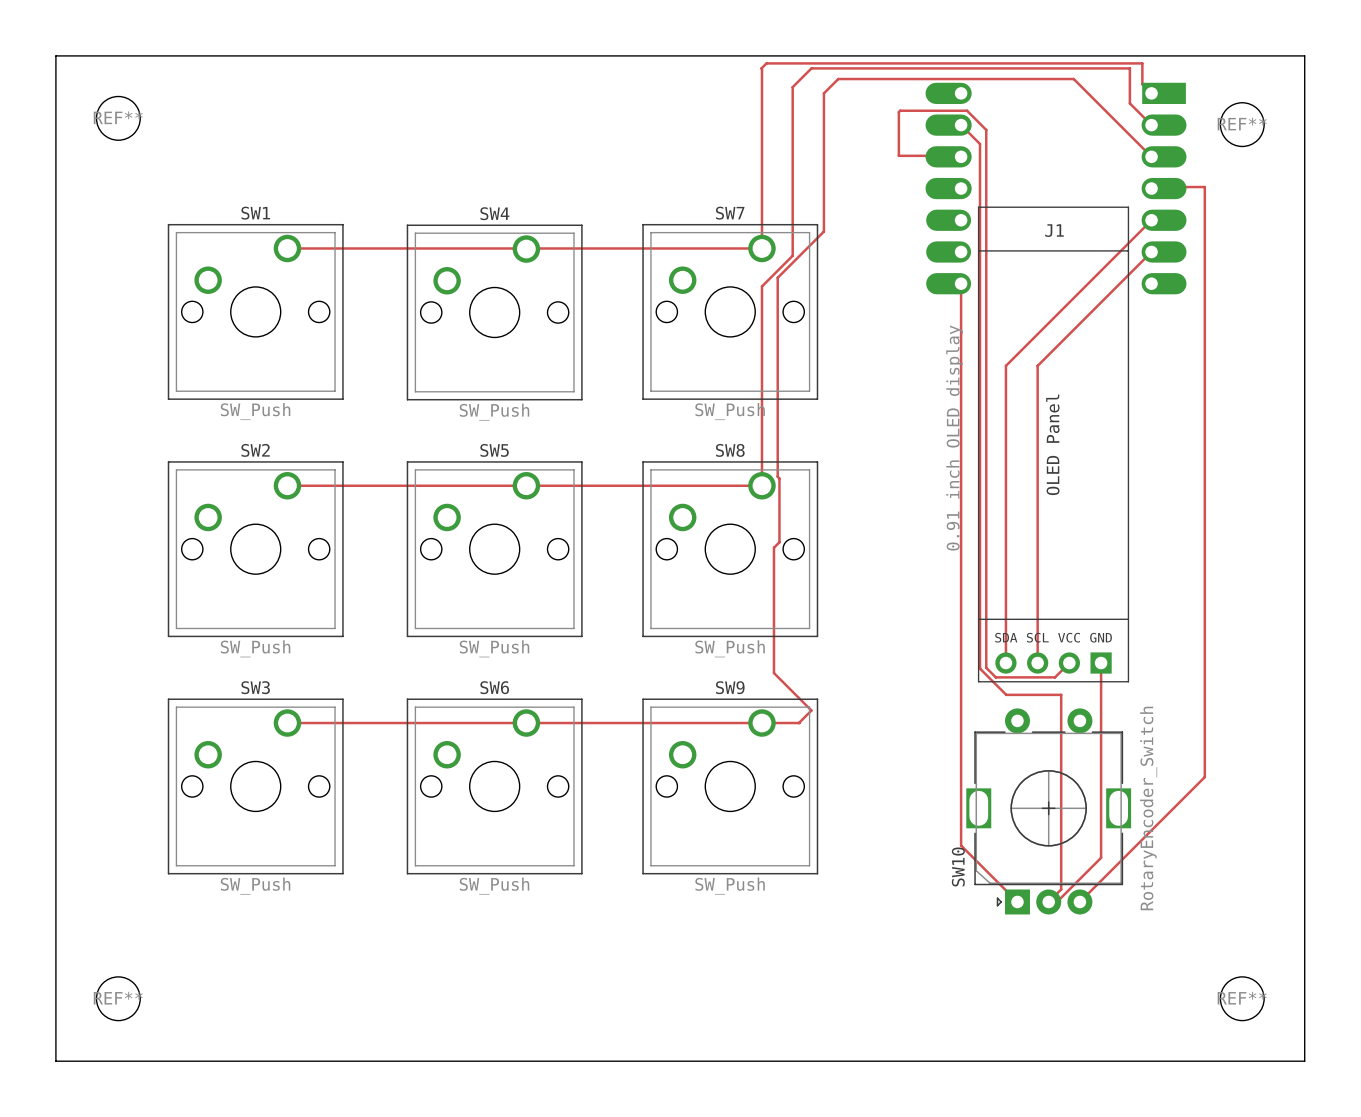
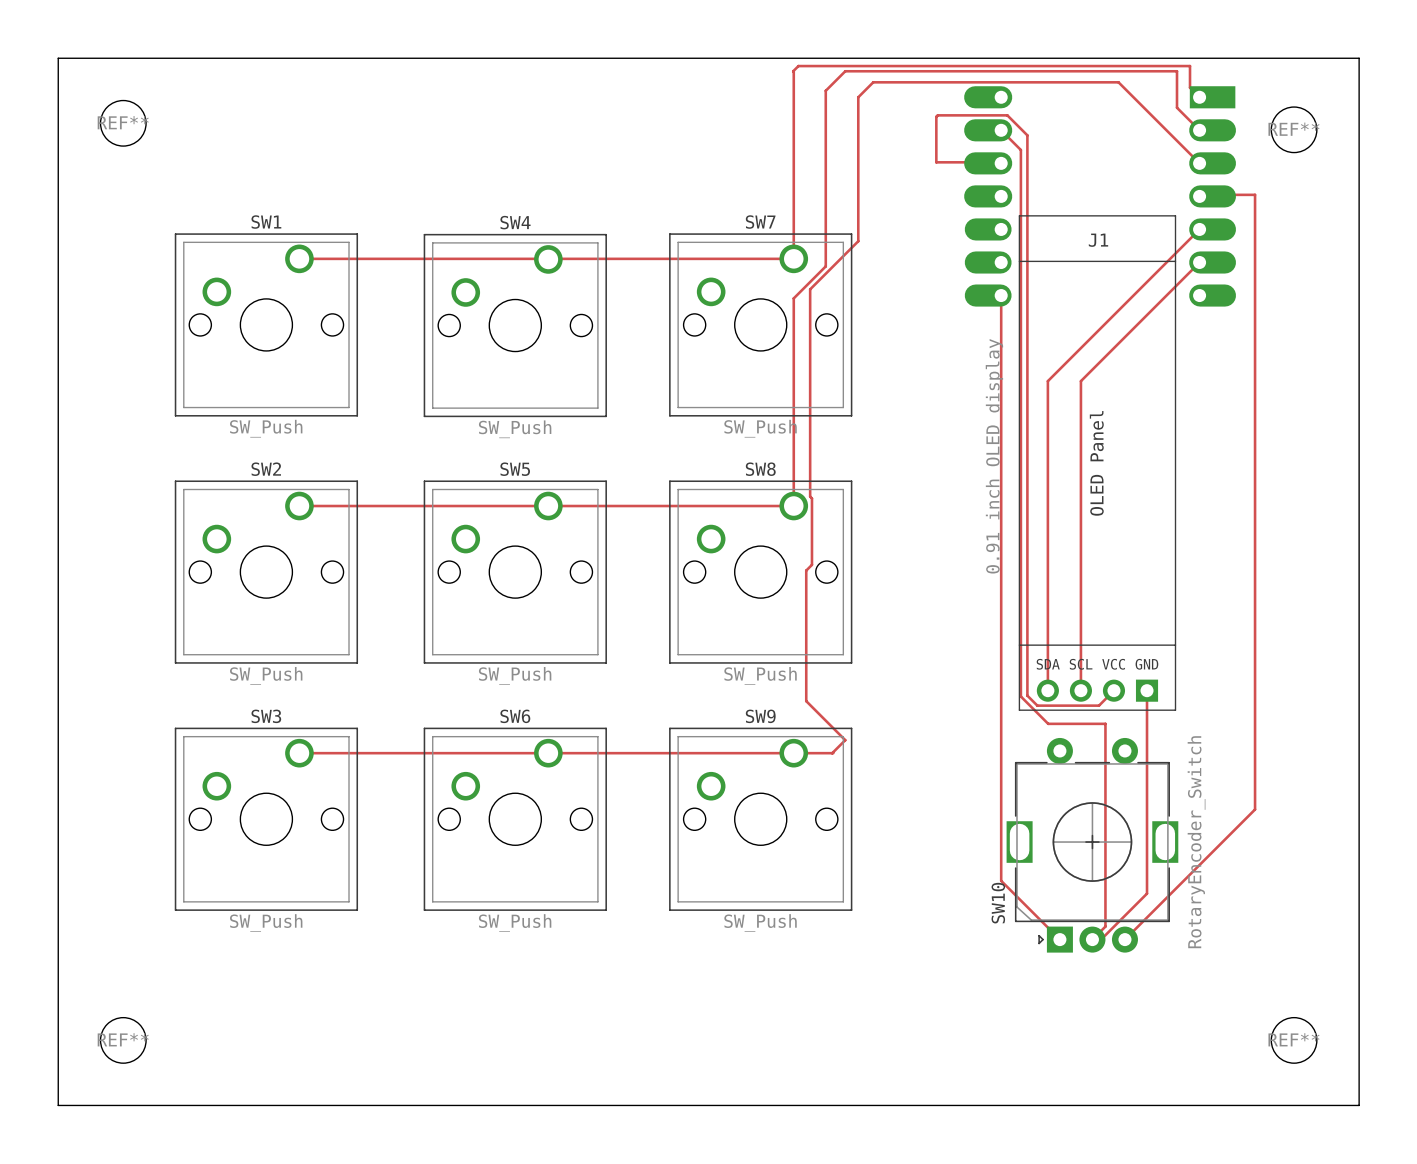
J1 footprint: [978, 206, 1129, 683] -> [1019, 215, 1176, 711]

